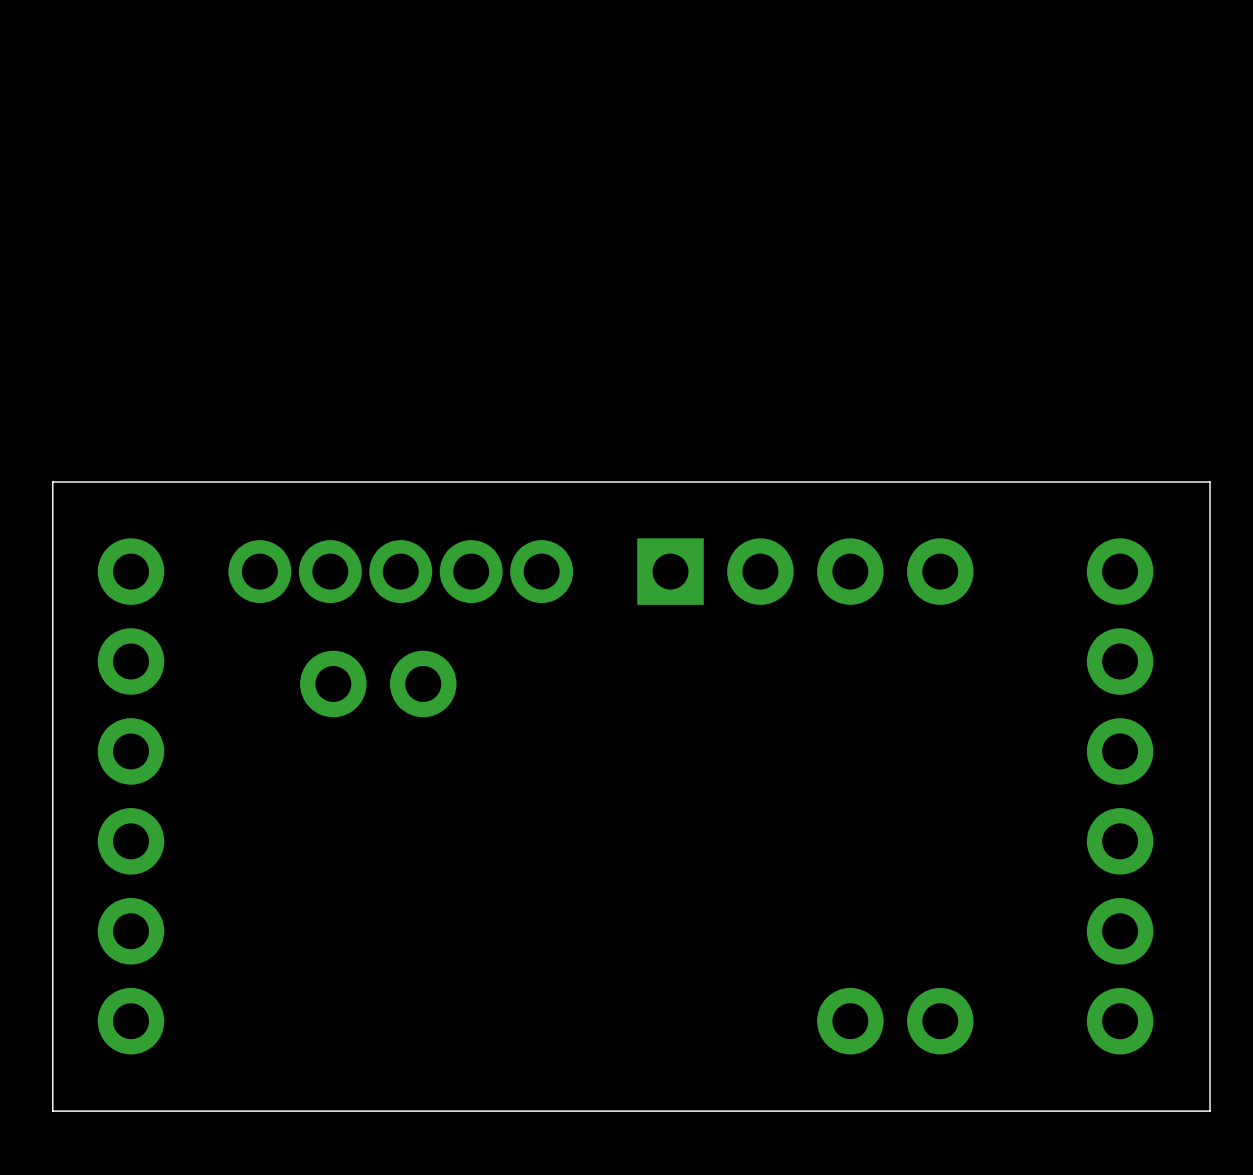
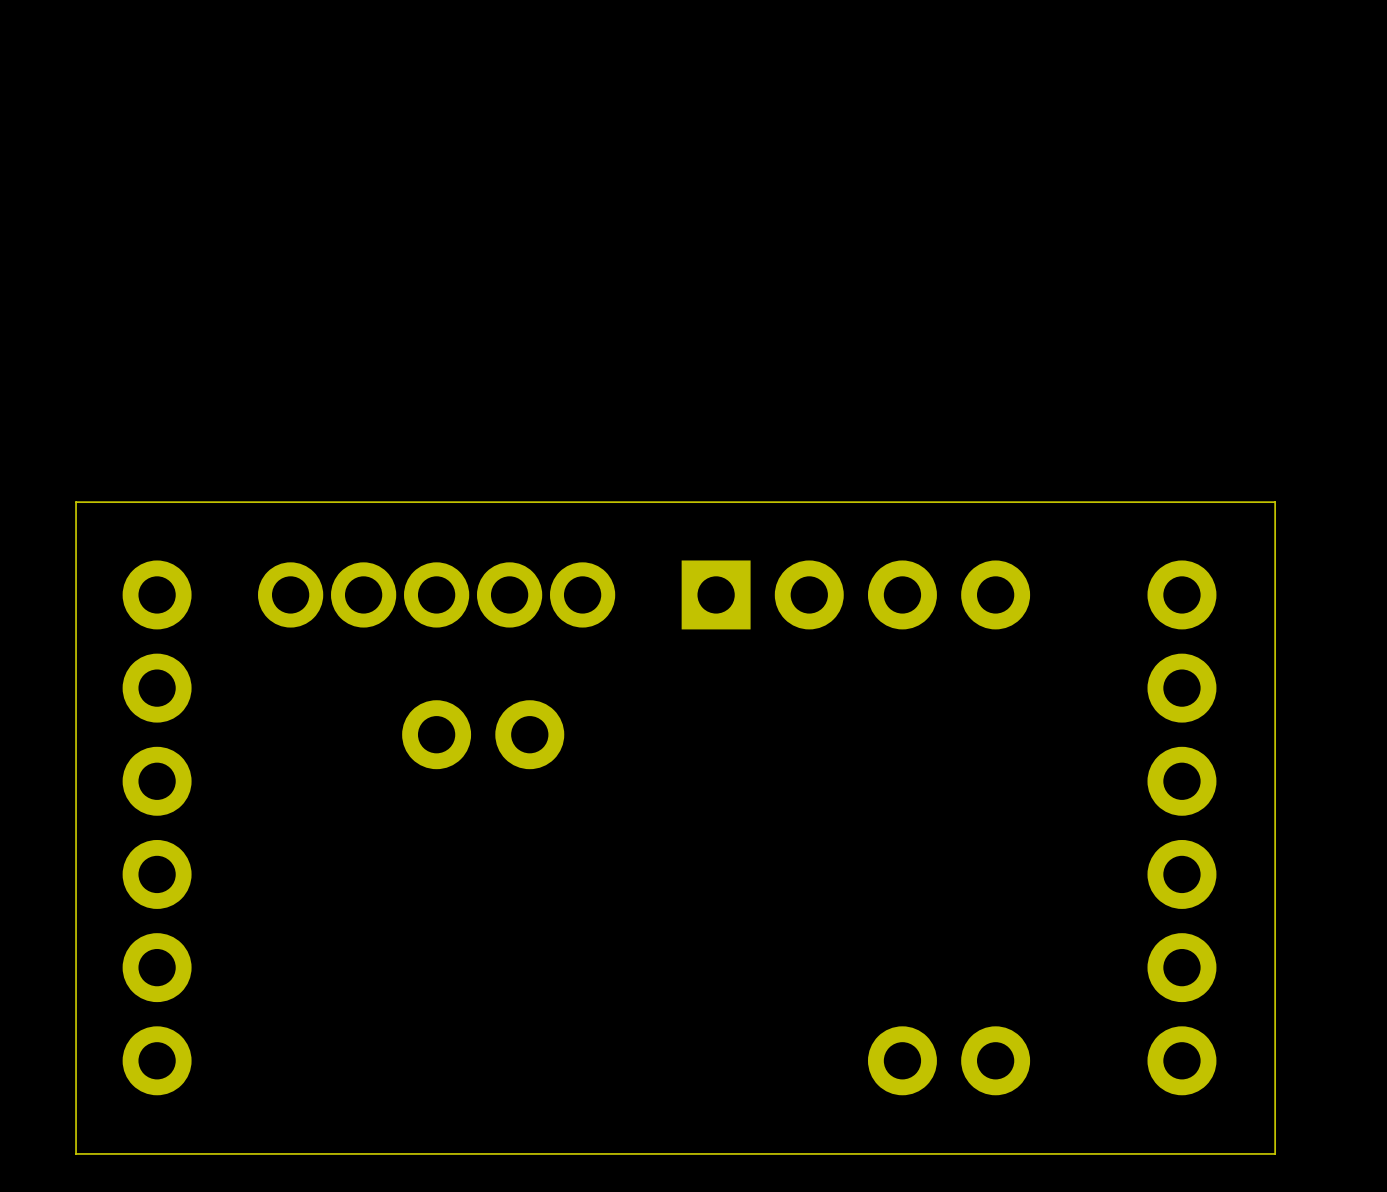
part position: (378, 683) -> (483, 734)

